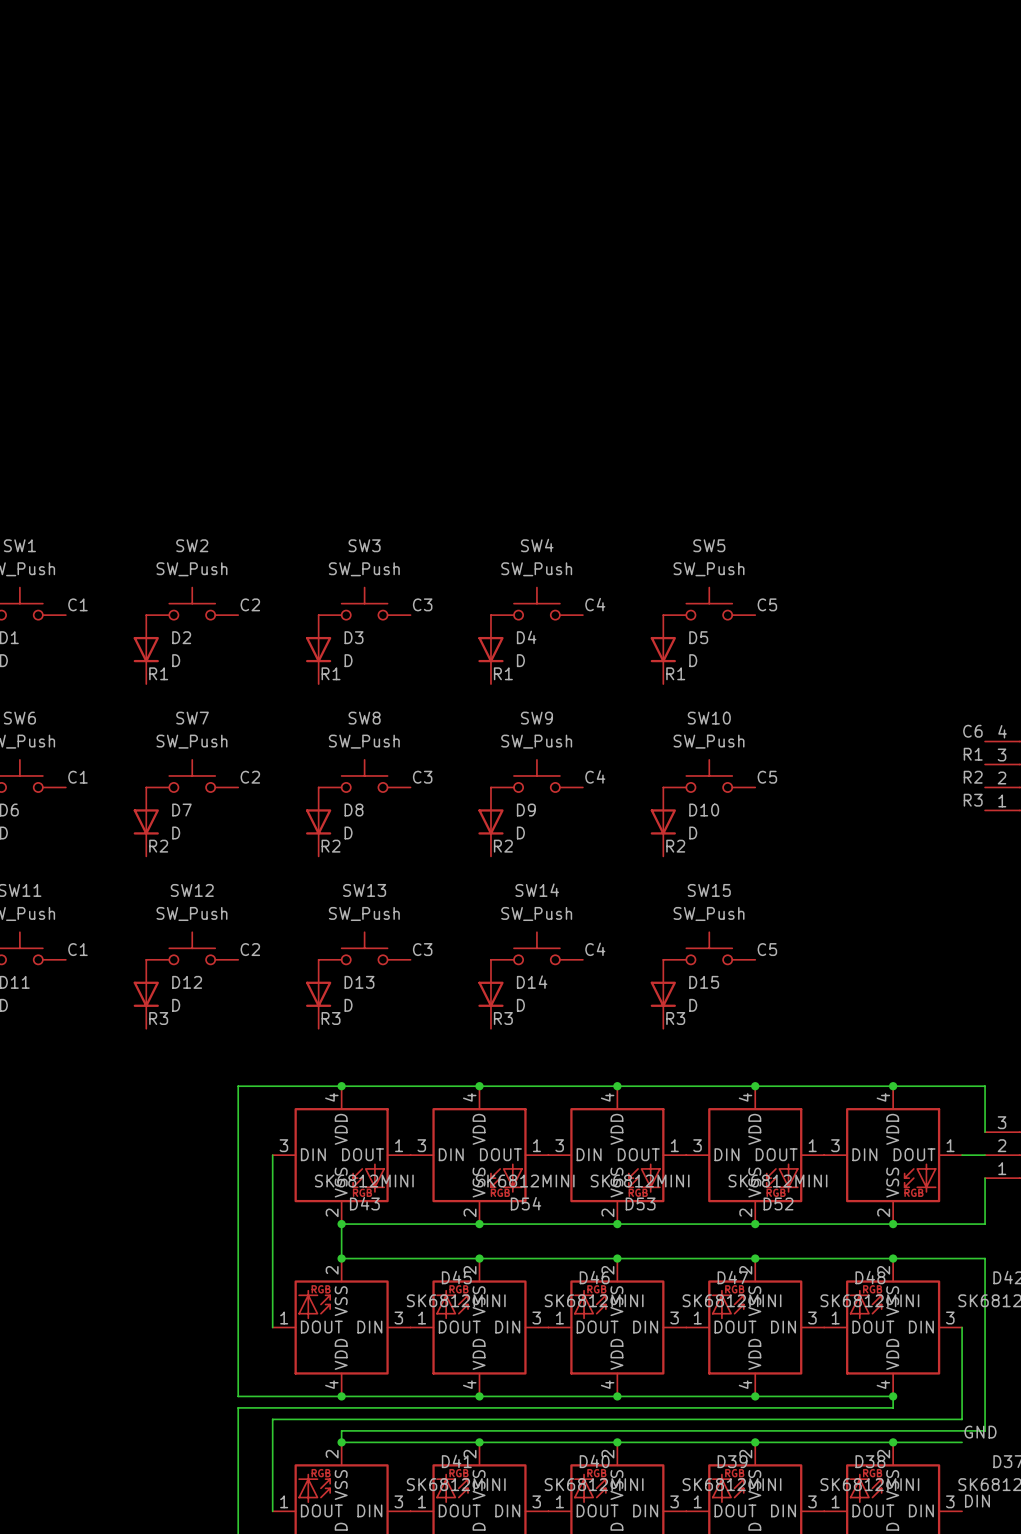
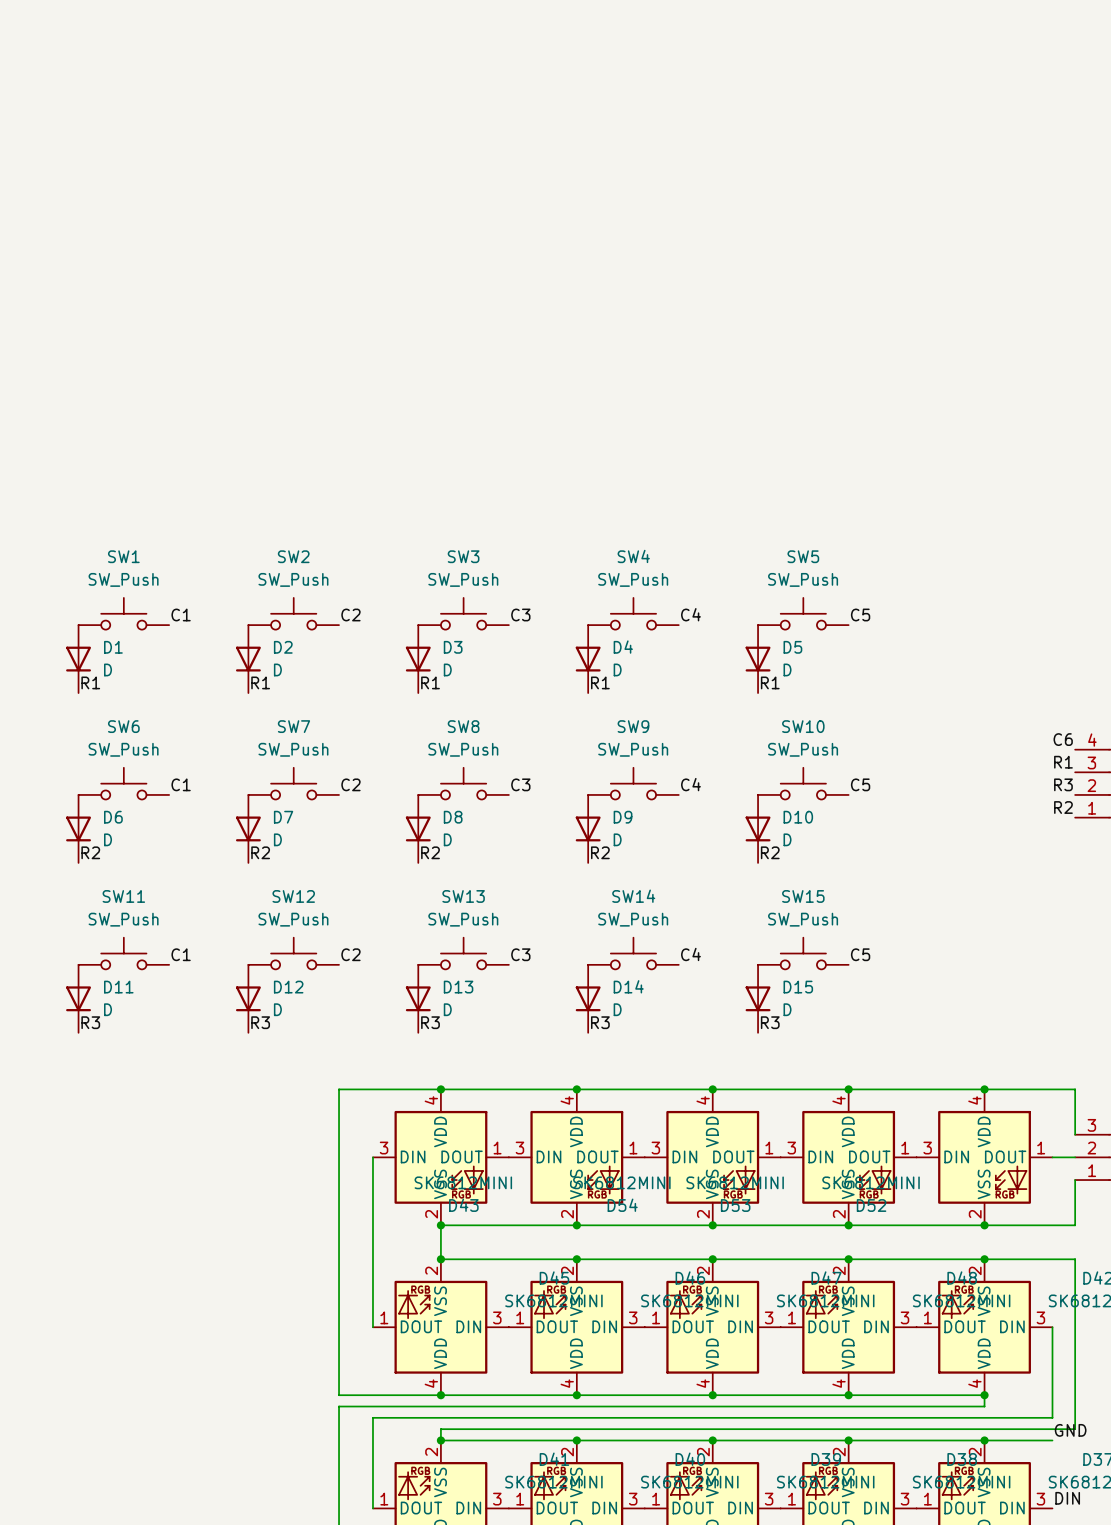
label: R2 (973, 777) -> R3 (1063, 784)
label: R3 (973, 800) -> R2 (1063, 807)

